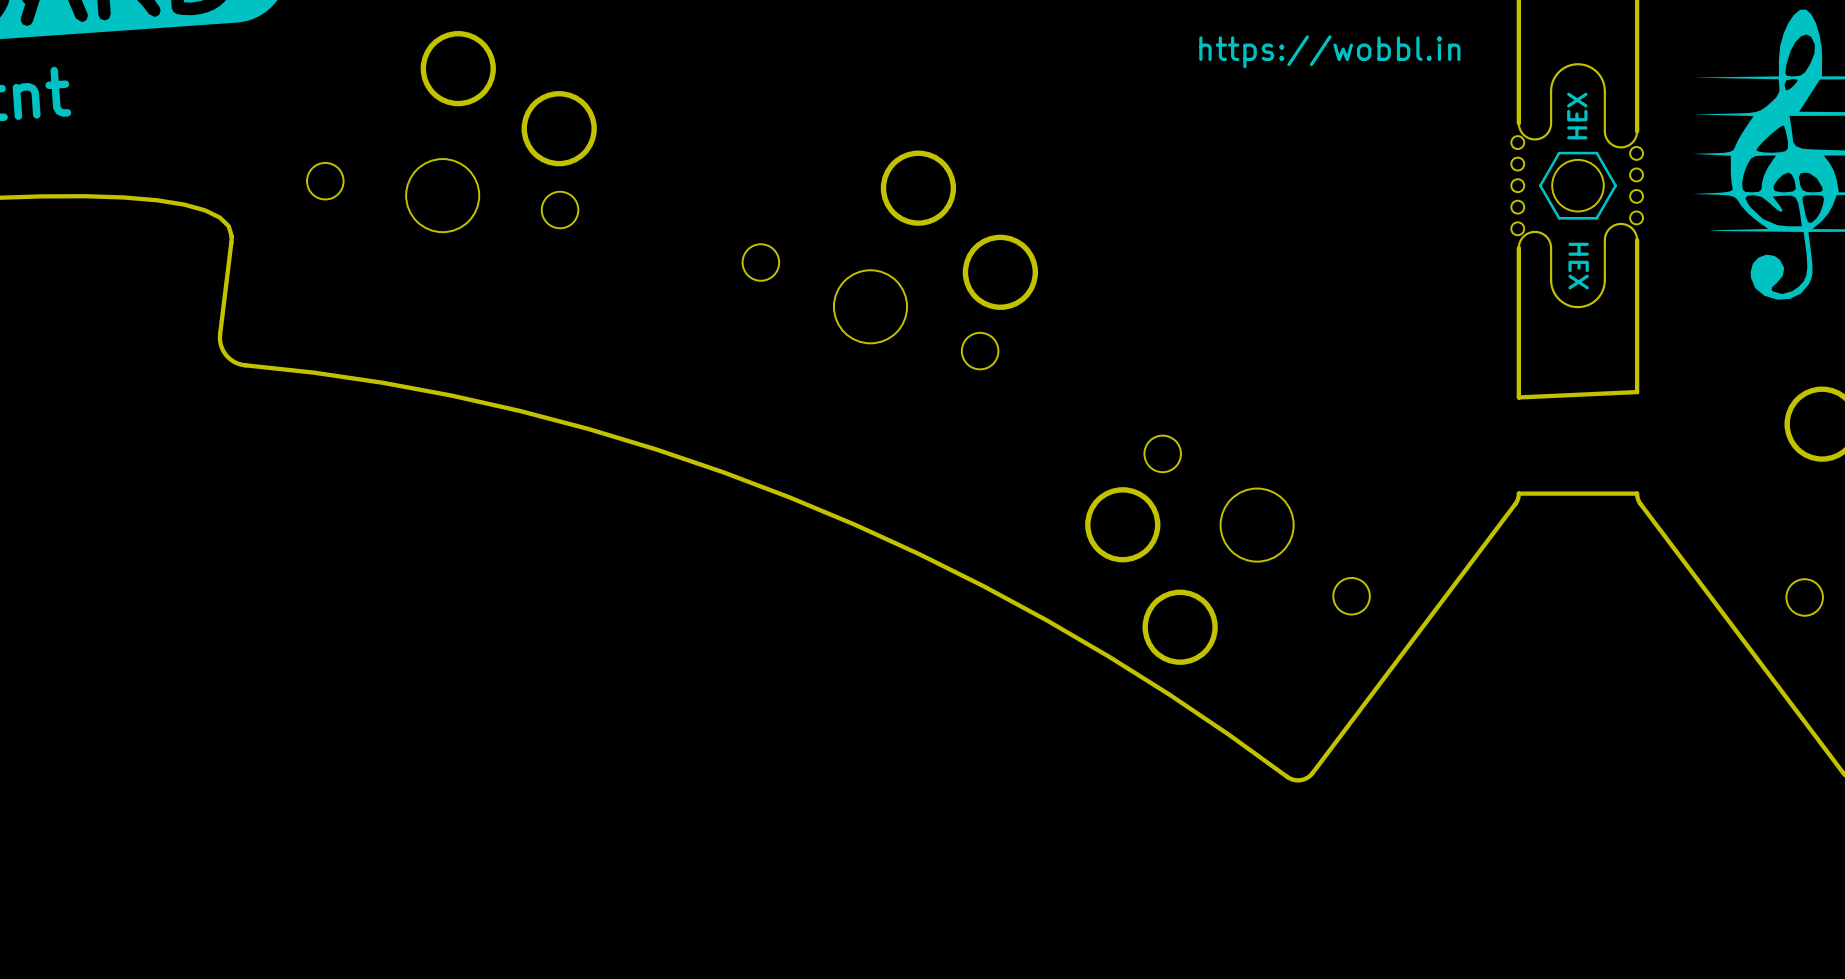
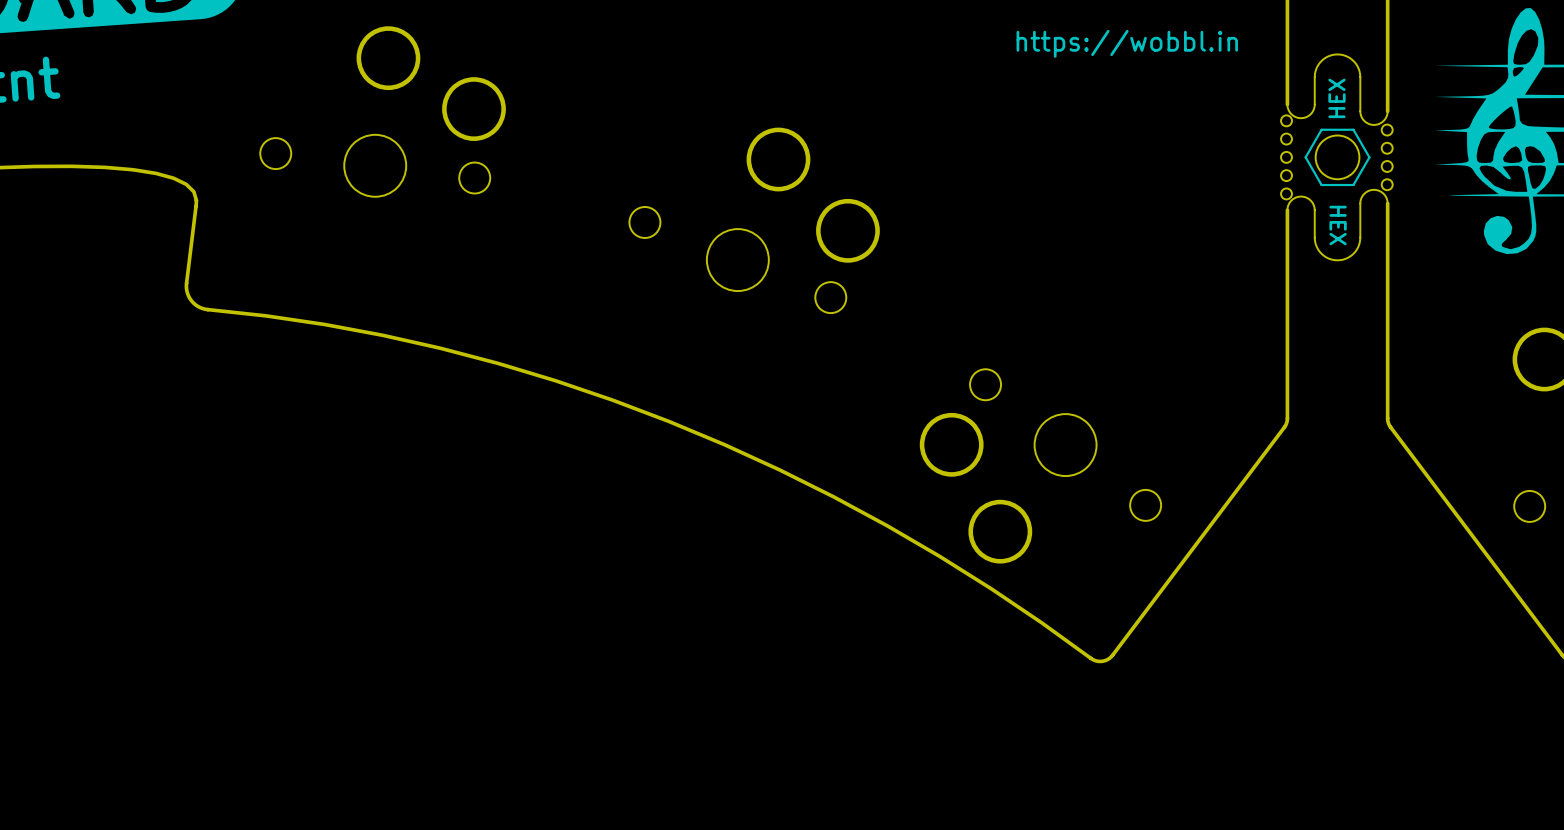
board edge: (1637, 392) (1518, 397) -> (1387, 332) (1387, 418)
board edge: (1518, 493) (1637, 493) -> (1287, 418) (1287, 336)

